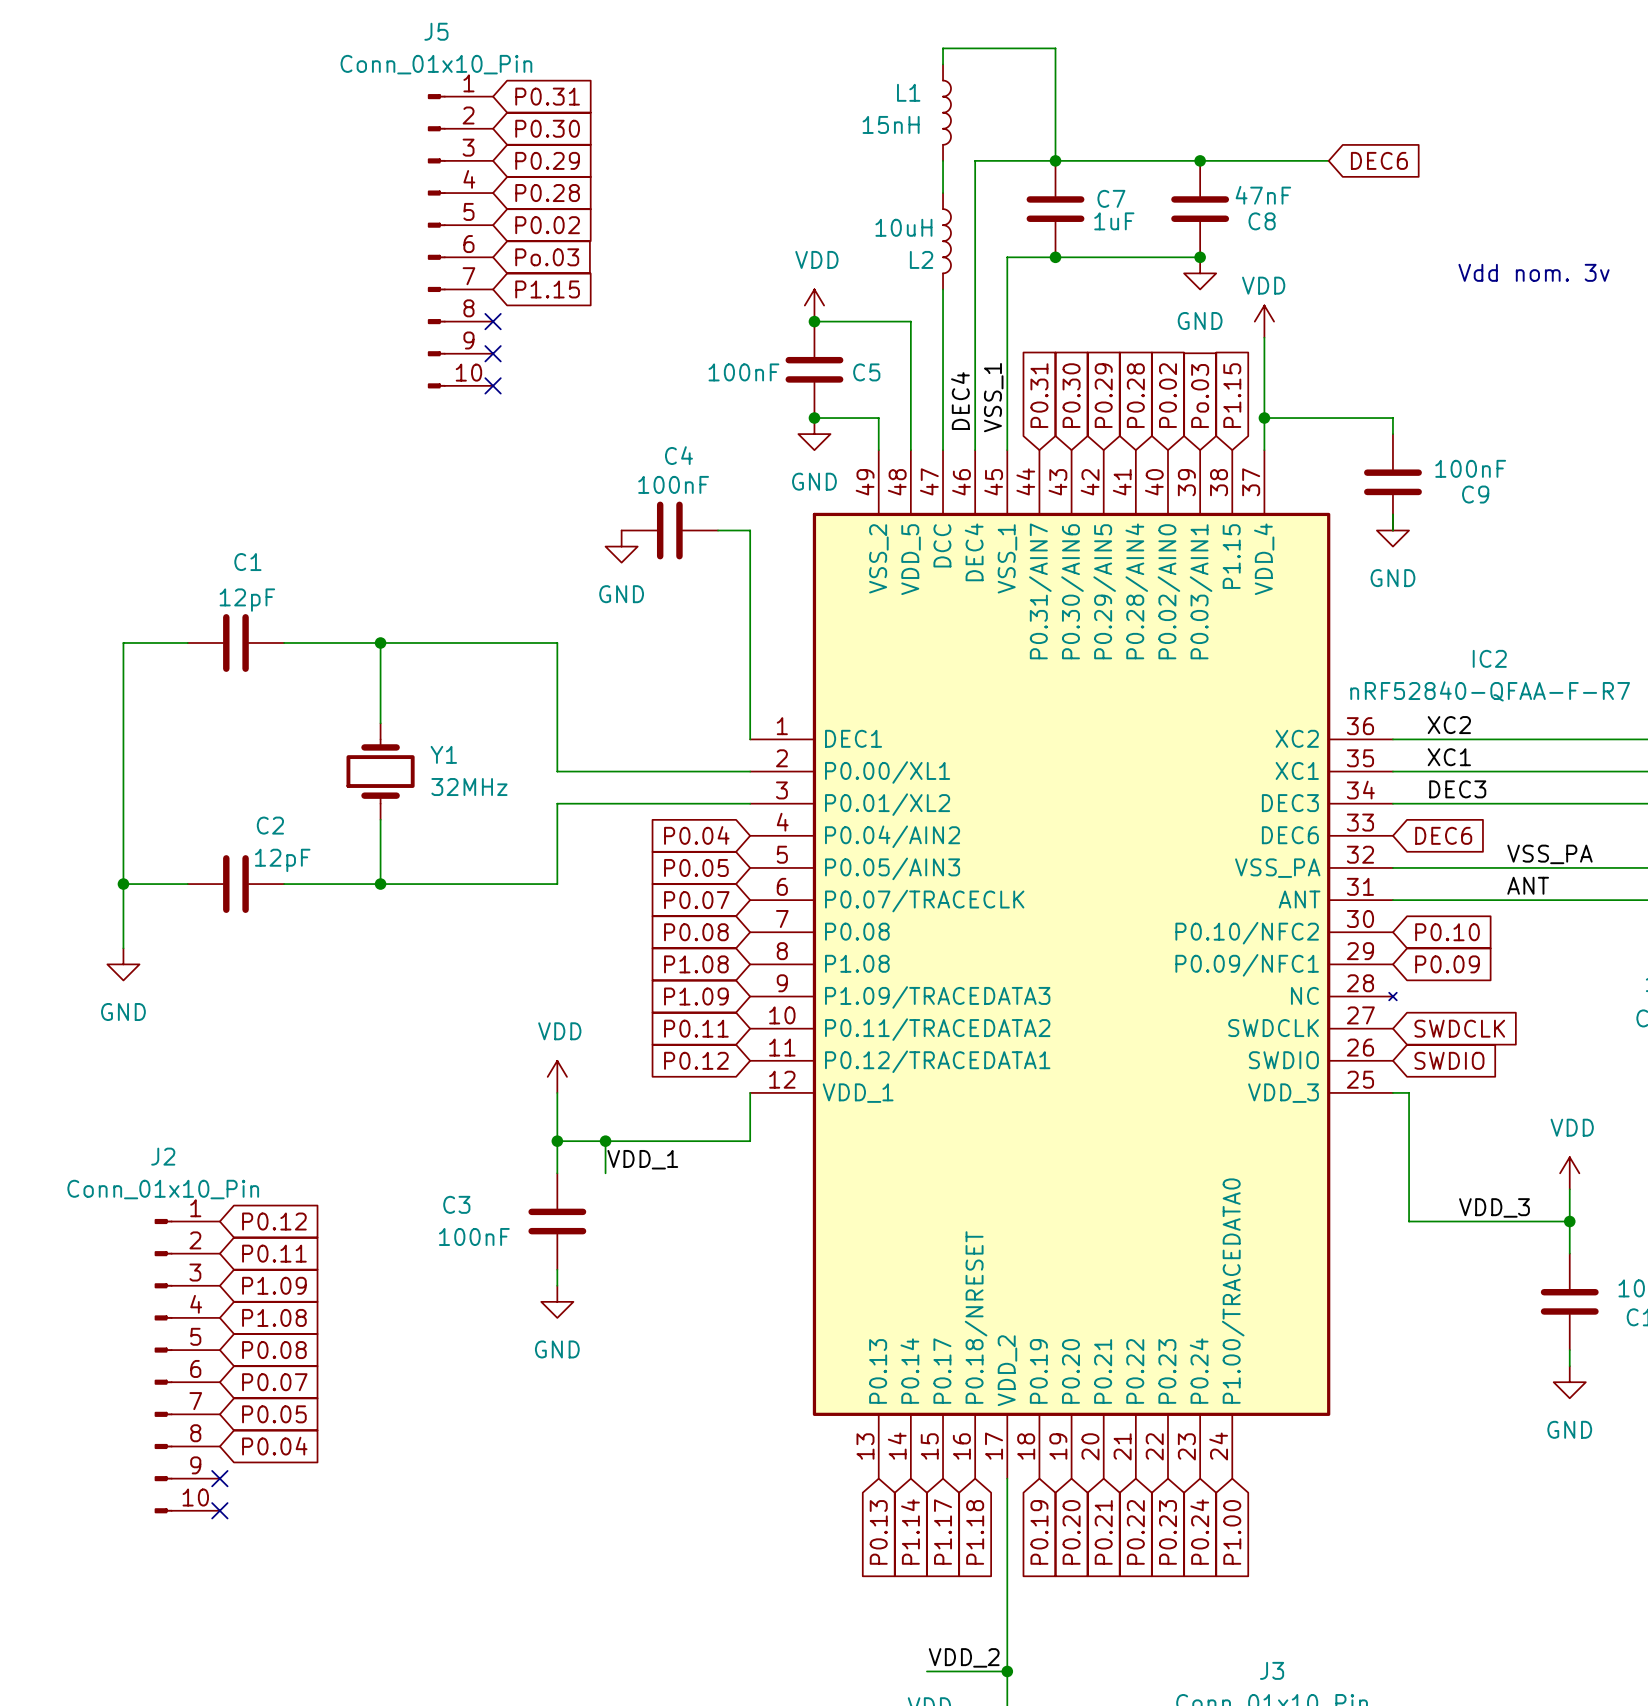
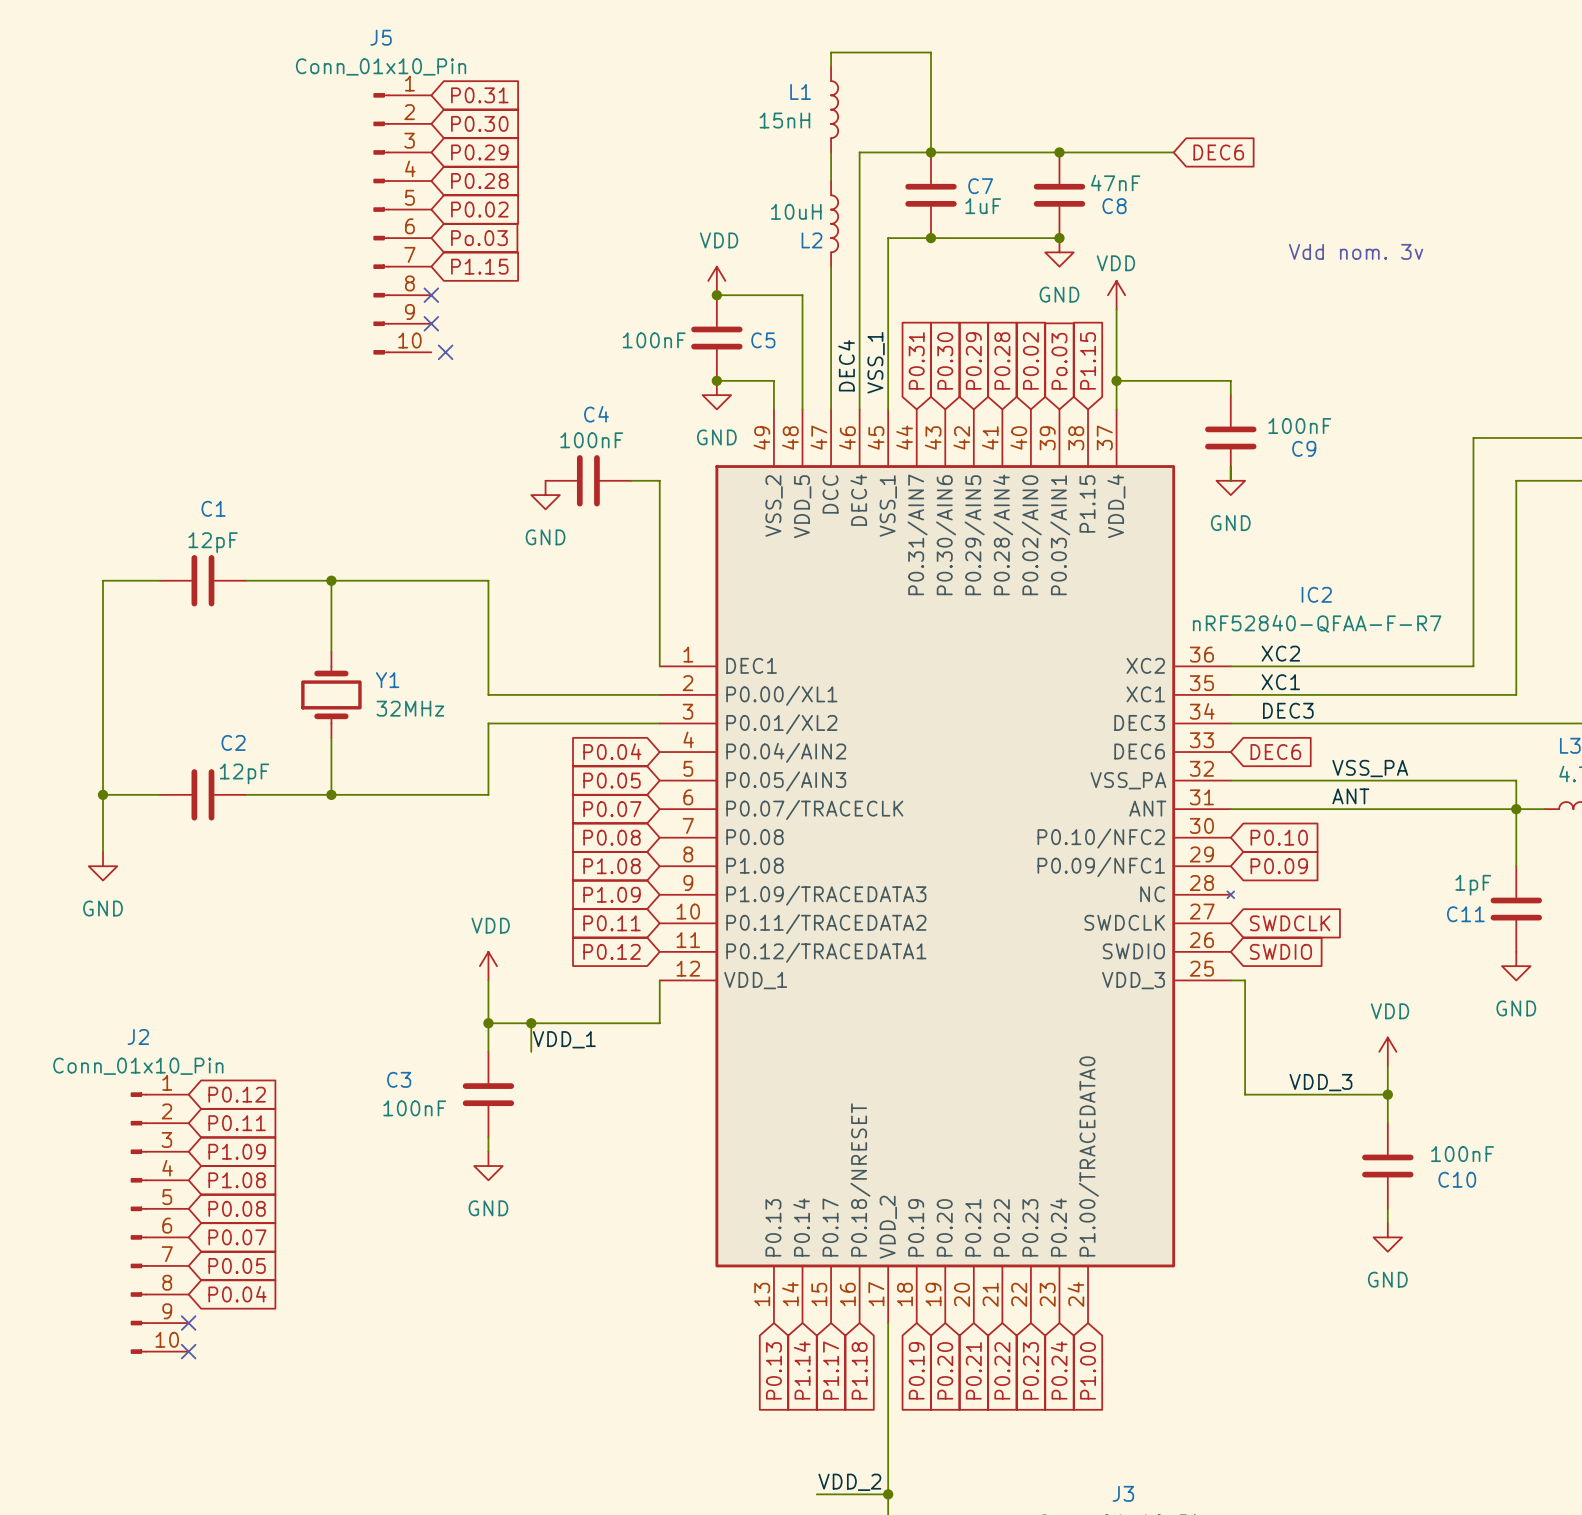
no-connect mark position: (493, 385) -> (445, 352)

